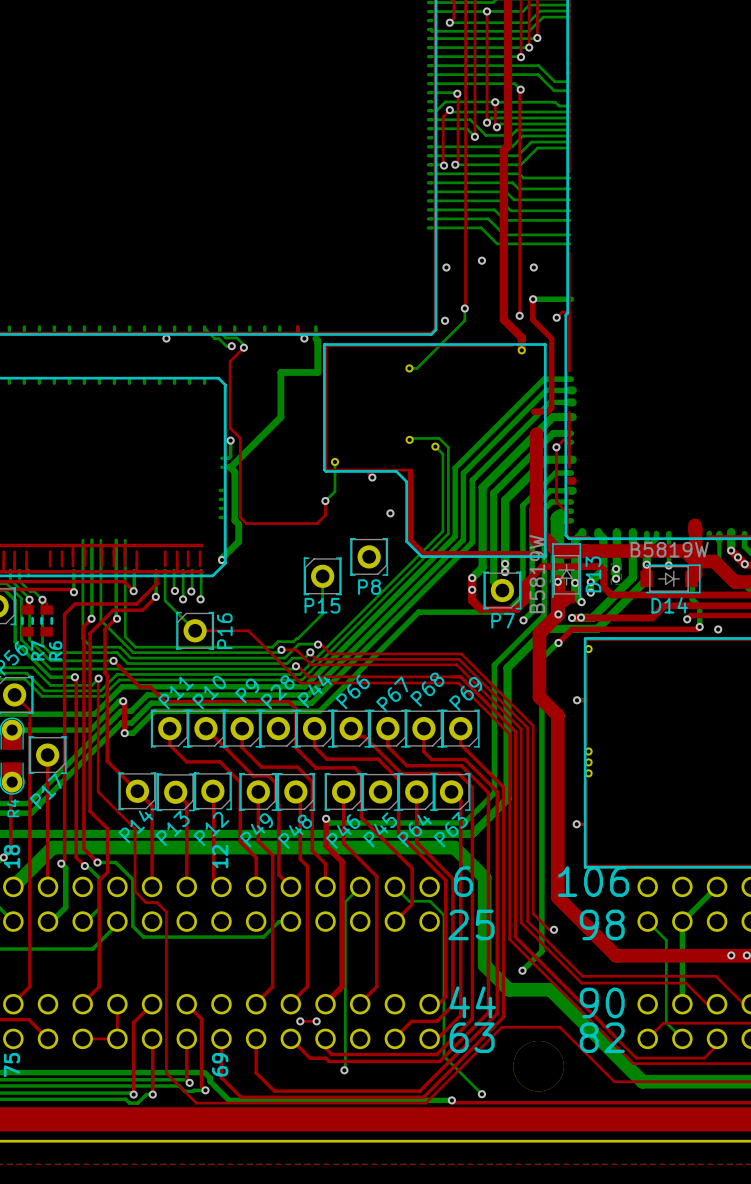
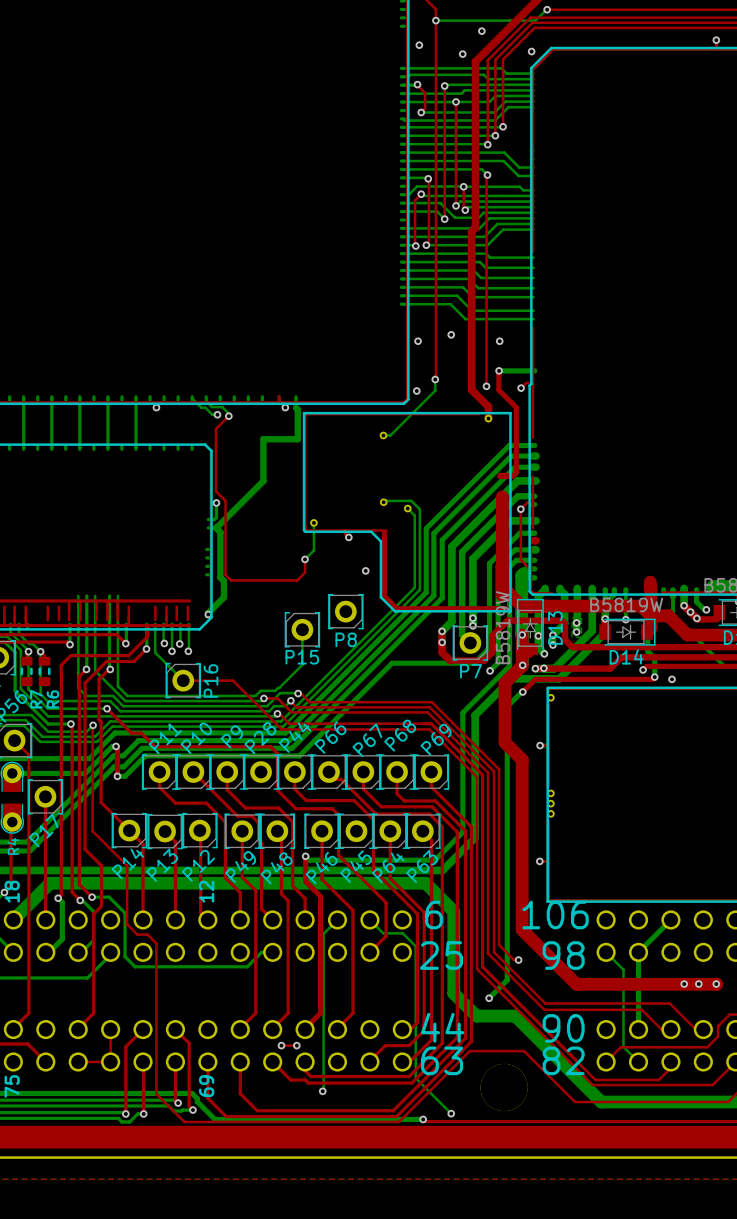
bottom track: none -> (23, 398) (23, 447)
bottom track: none -> (51, 398) (51, 447)
bottom track: none -> (79, 398) (79, 447)
bottom track: none -> (107, 398) (107, 447)
bottom track: none -> (136, 398) (136, 447)

